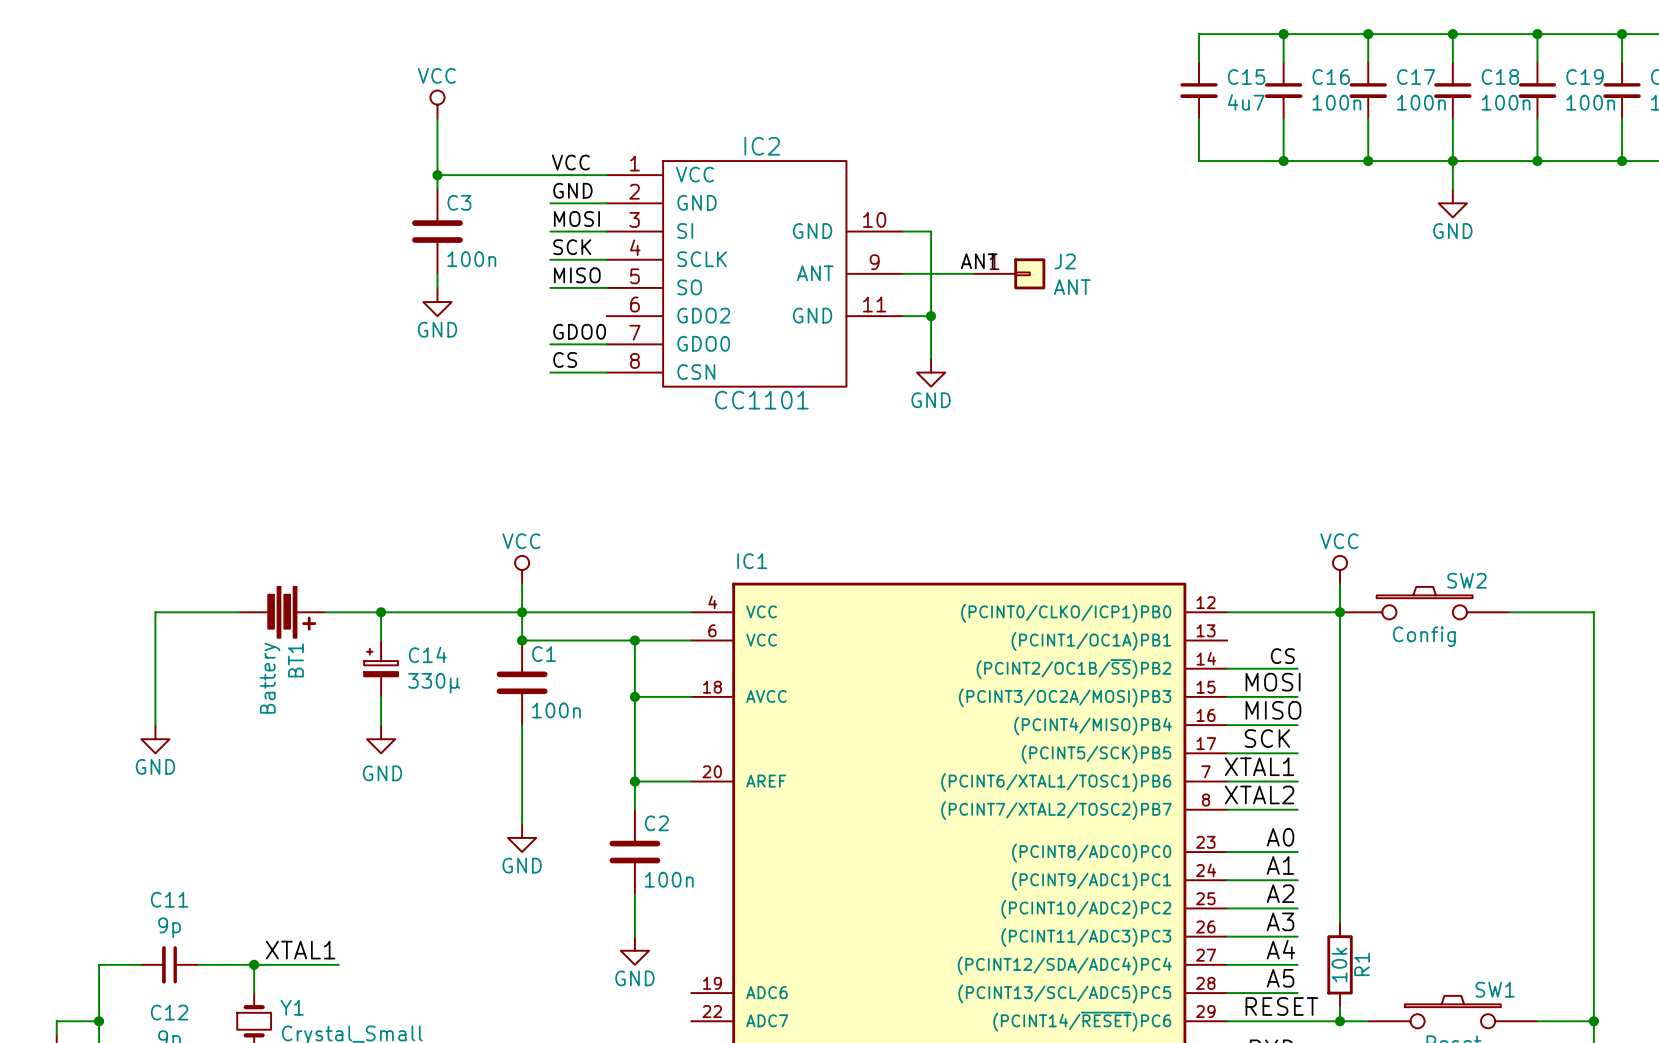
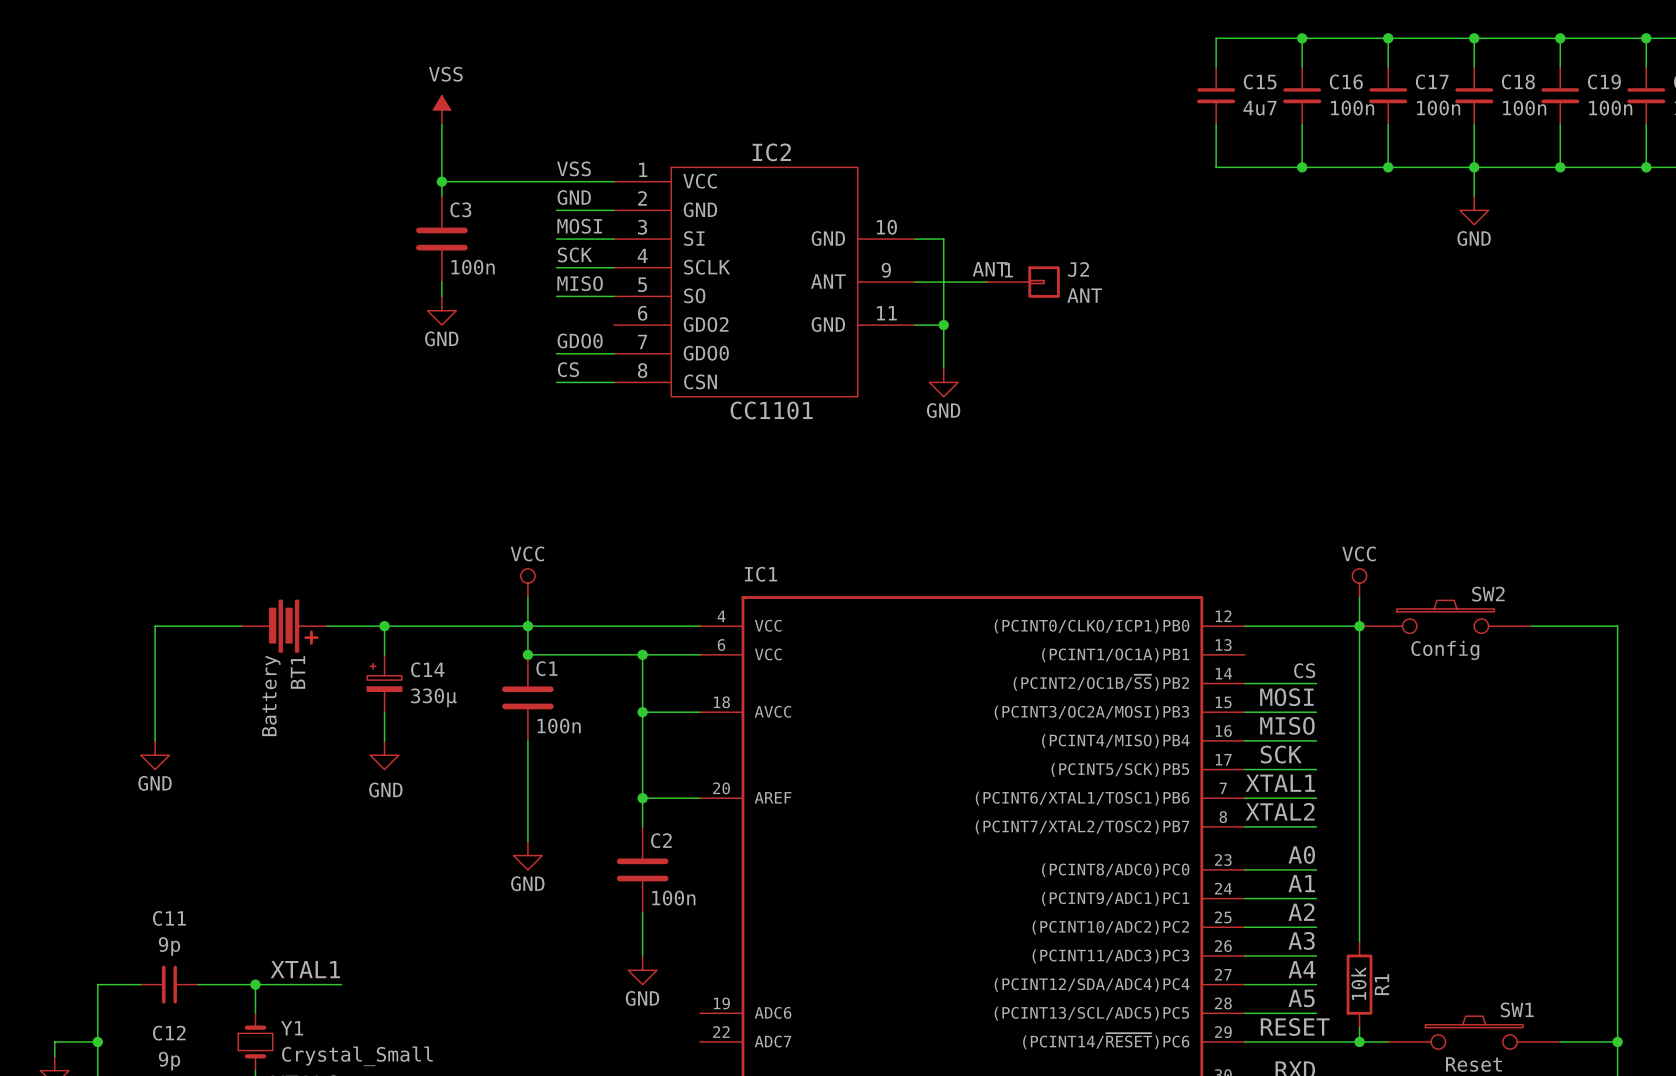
power symbol: VCC (437, 104) -> VSS (441, 110)
label: VCC (570, 162) -> VSS (573, 168)

